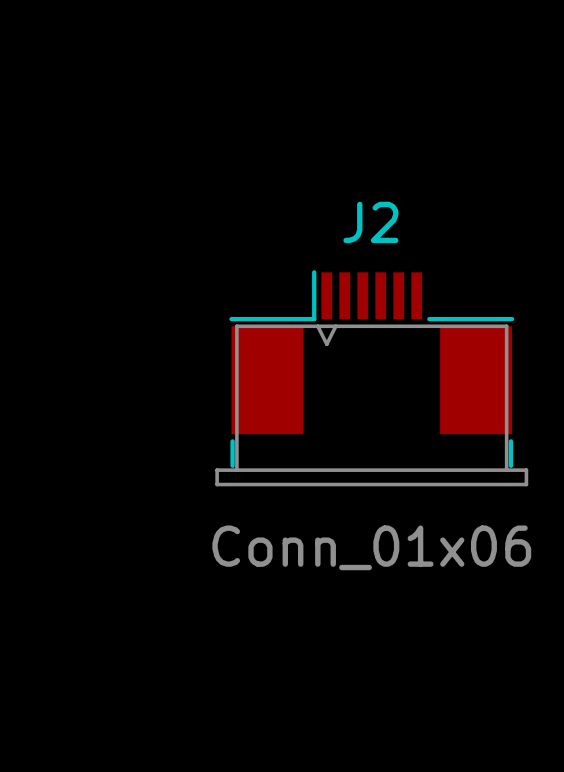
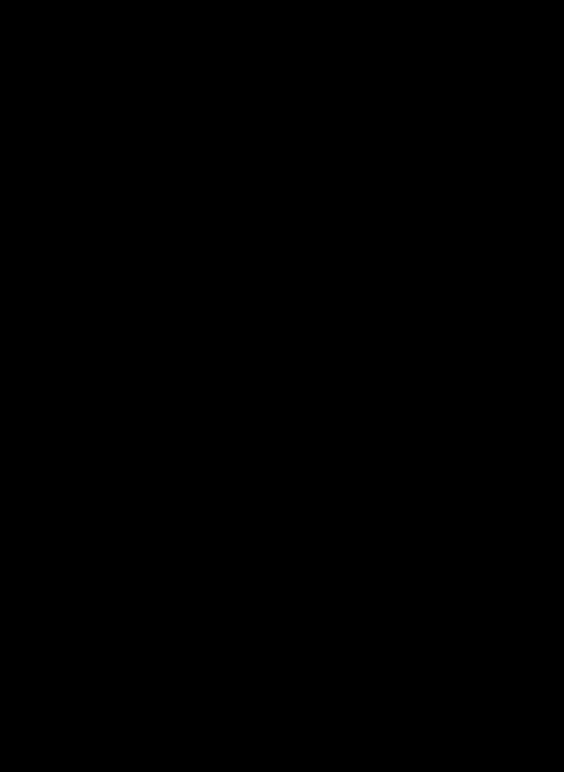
J2: Conn_01x06 (371, 378) -> none

